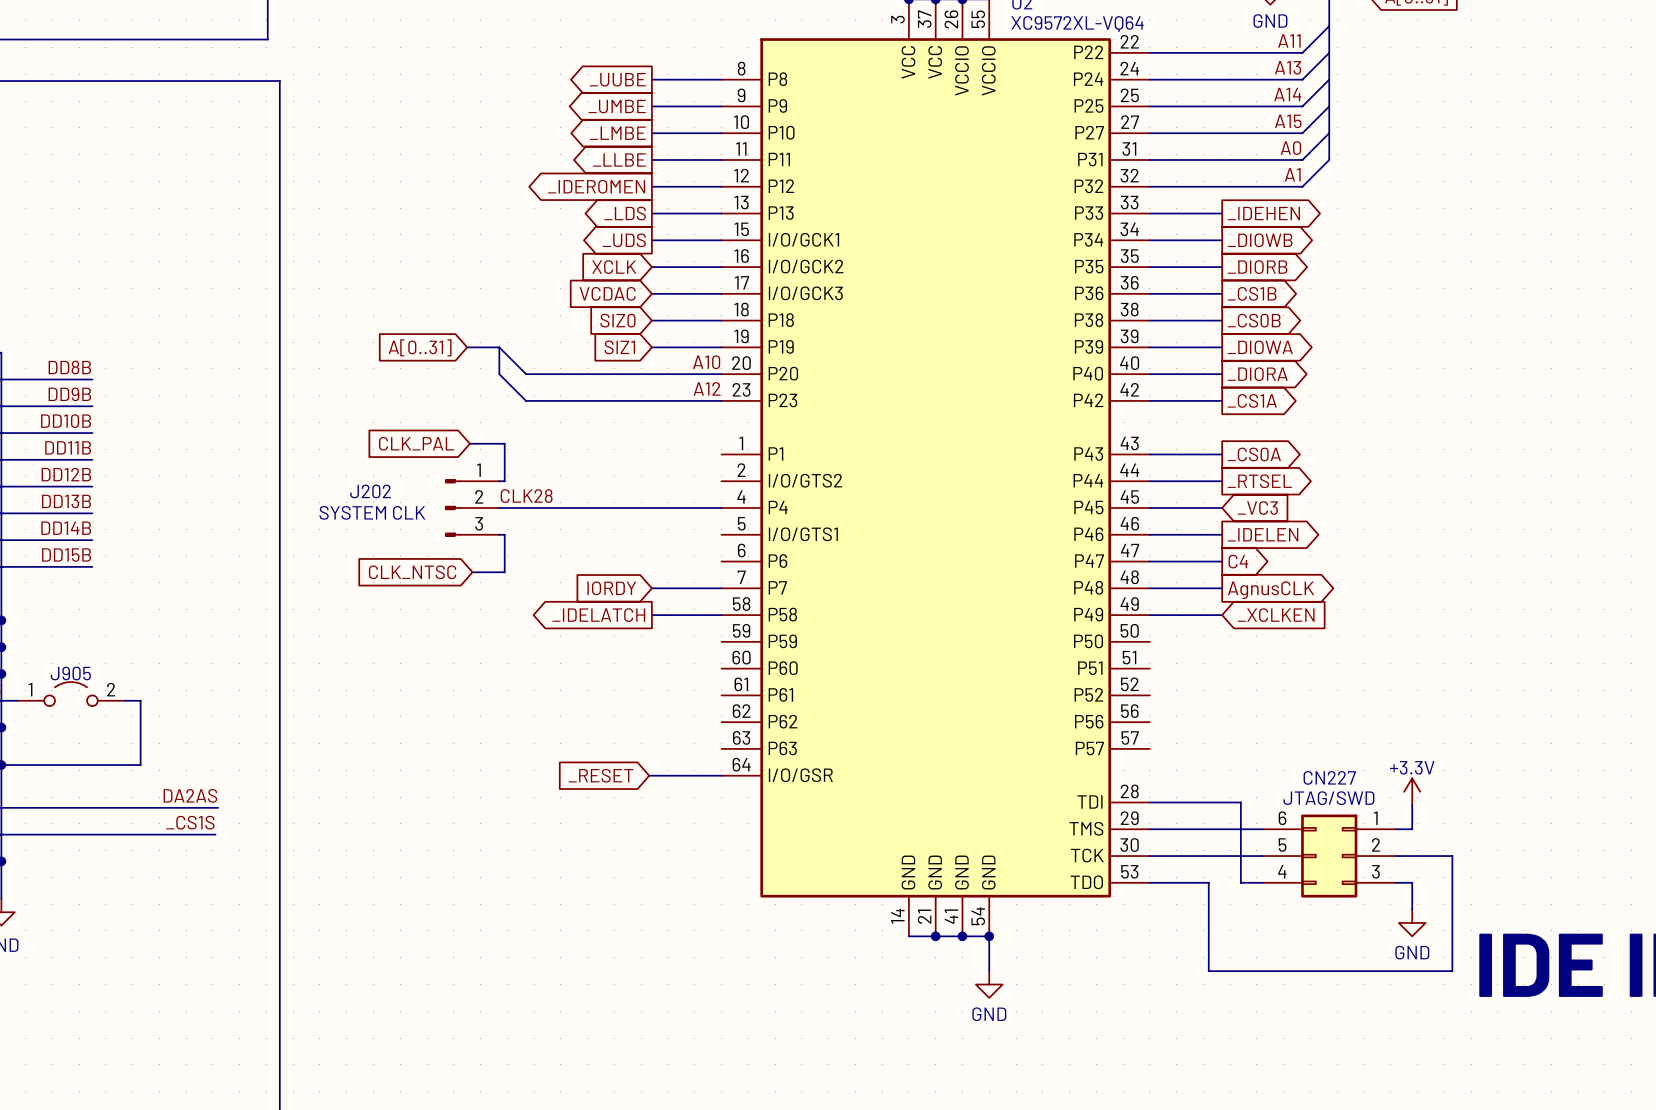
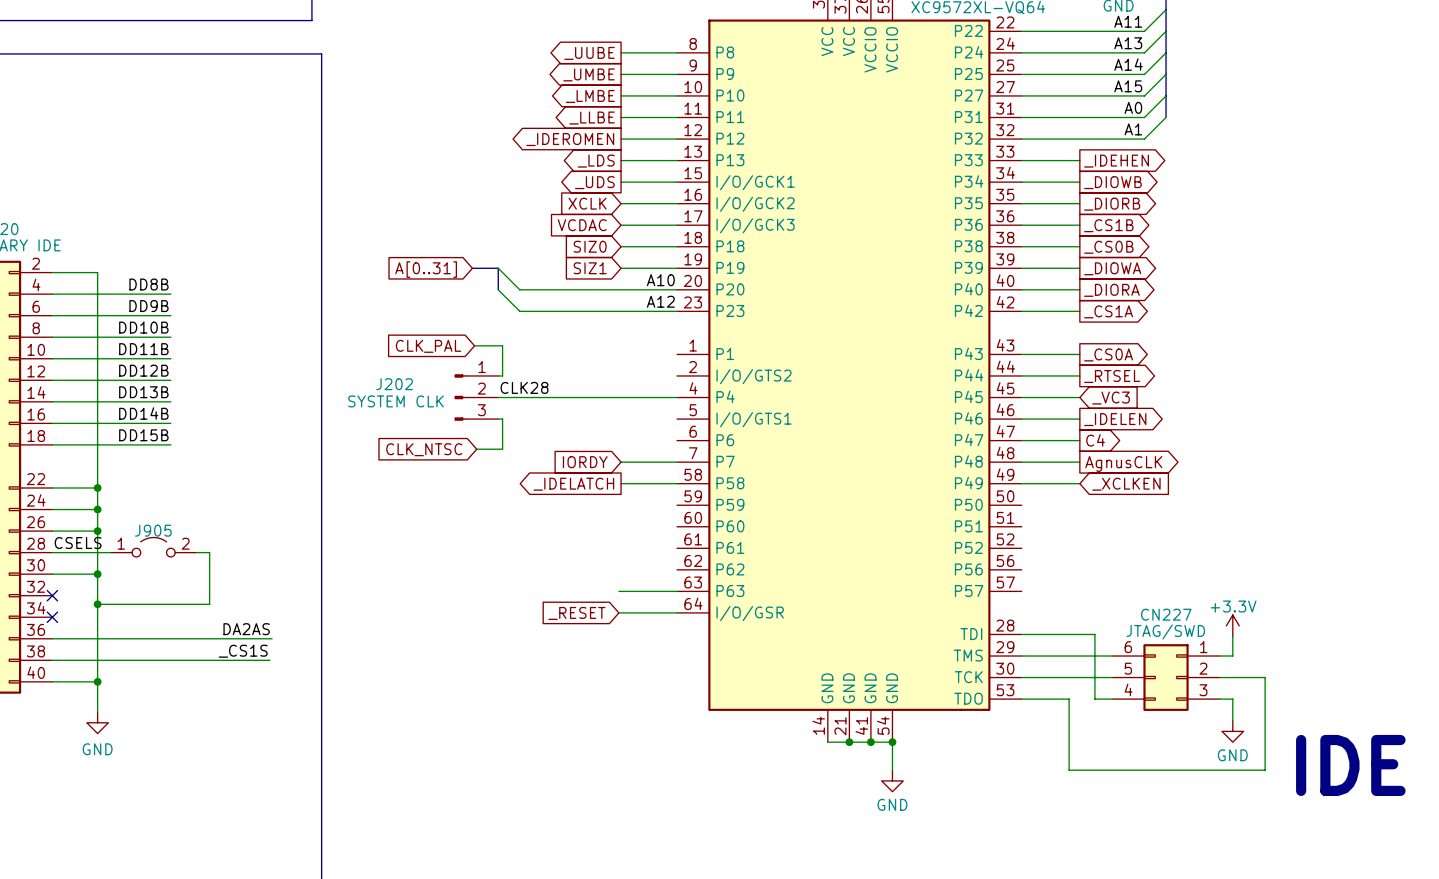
wire: none -> (618, 591) (677, 591)

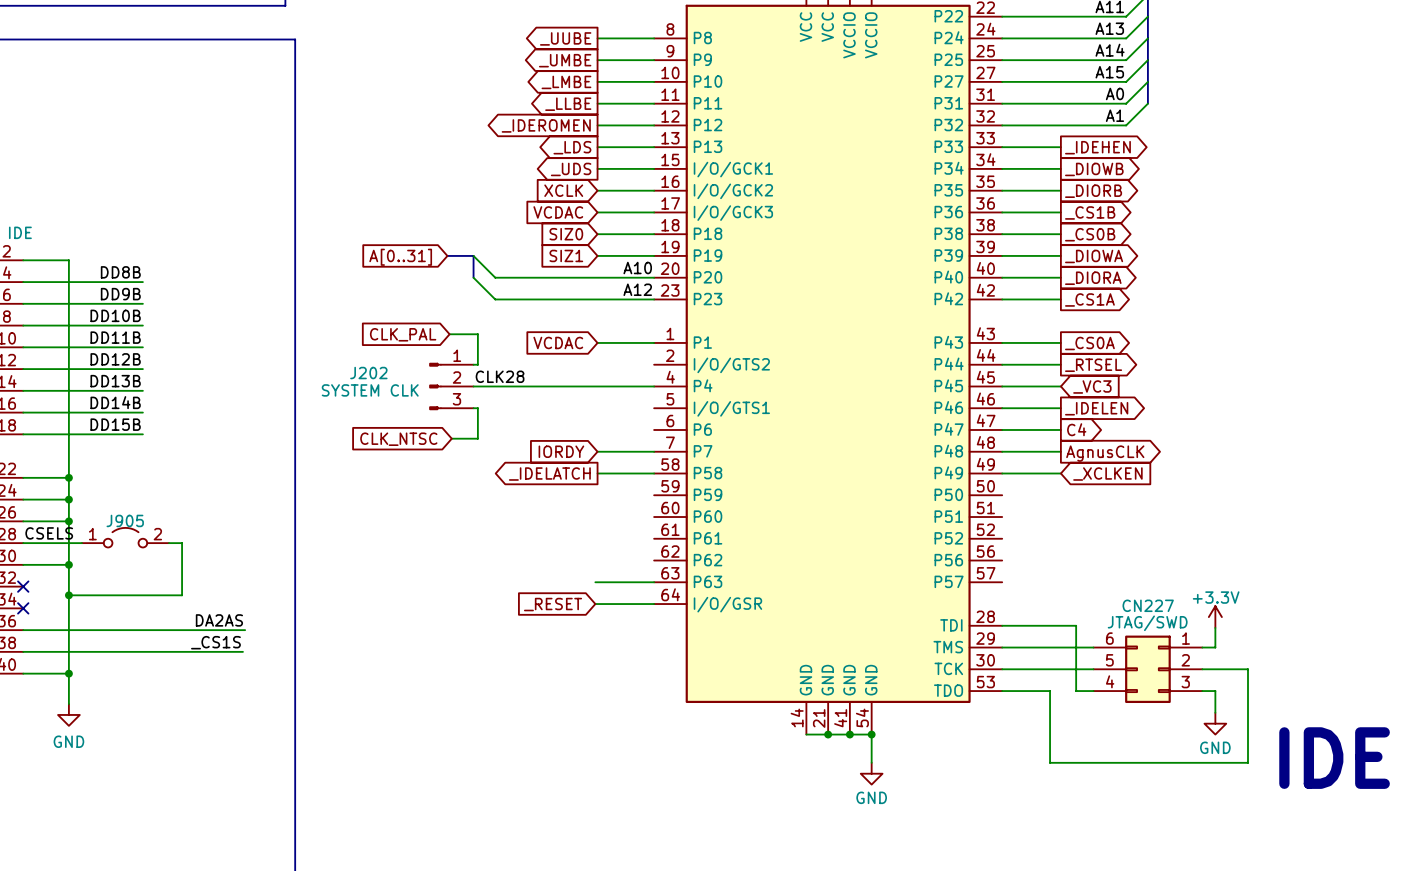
global label: none -> VCDAC (558, 342)
wire: none -> (597, 342) (654, 342)

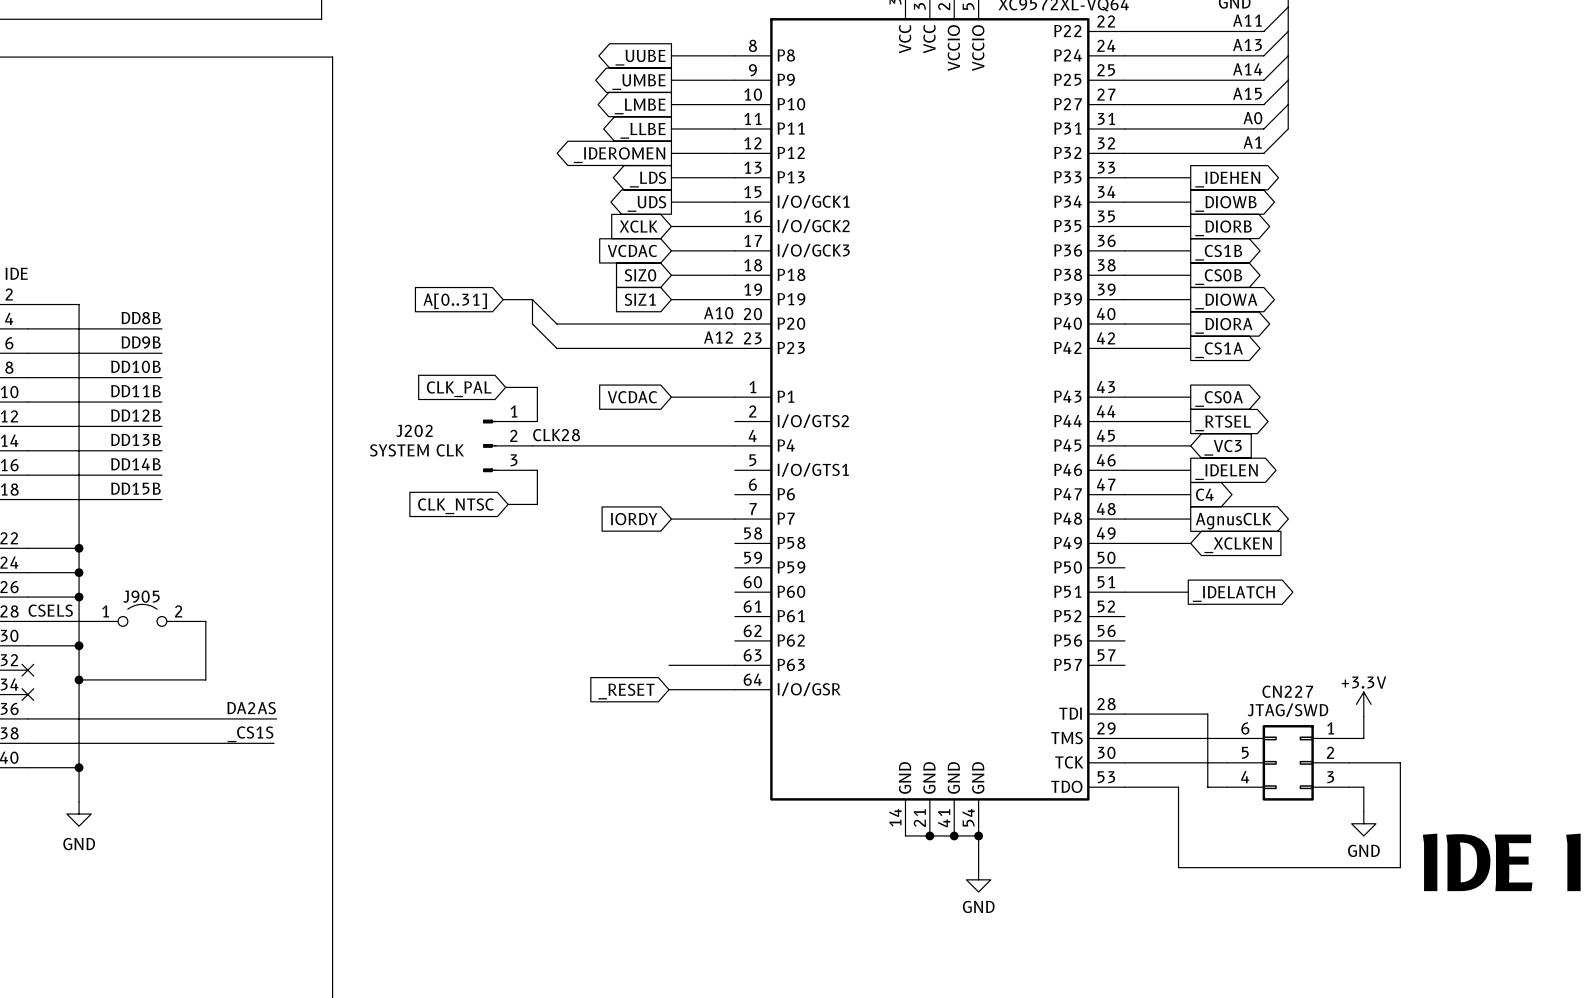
wire: (597, 473) (654, 473) -> none
global label: _IDELATCH (549, 474) -> none
wire: none -> (1124, 592) (1188, 592)
global label: none -> _IDELATCH (1233, 594)

